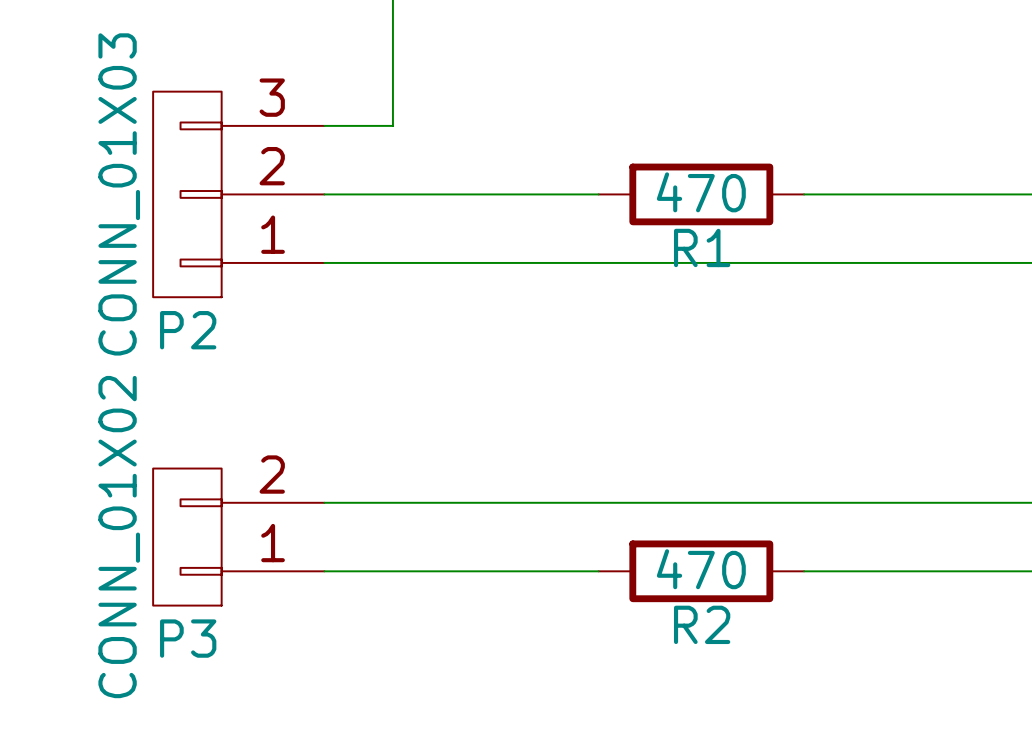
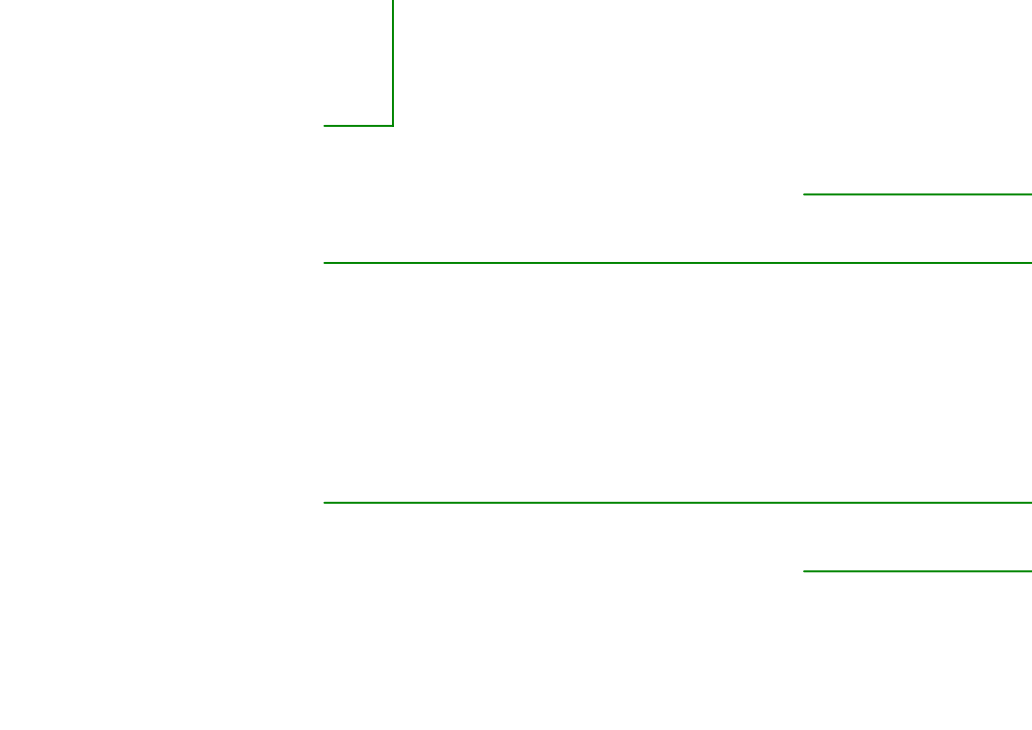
P2: CONN_01X03 (238, 194) -> none
wire: (324, 194) (598, 194) -> none
R1: 470 (701, 194) -> none
P3: CONN_01X02 (238, 537) -> none
wire: (324, 571) (598, 571) -> none
R2: 470 (701, 571) -> none

